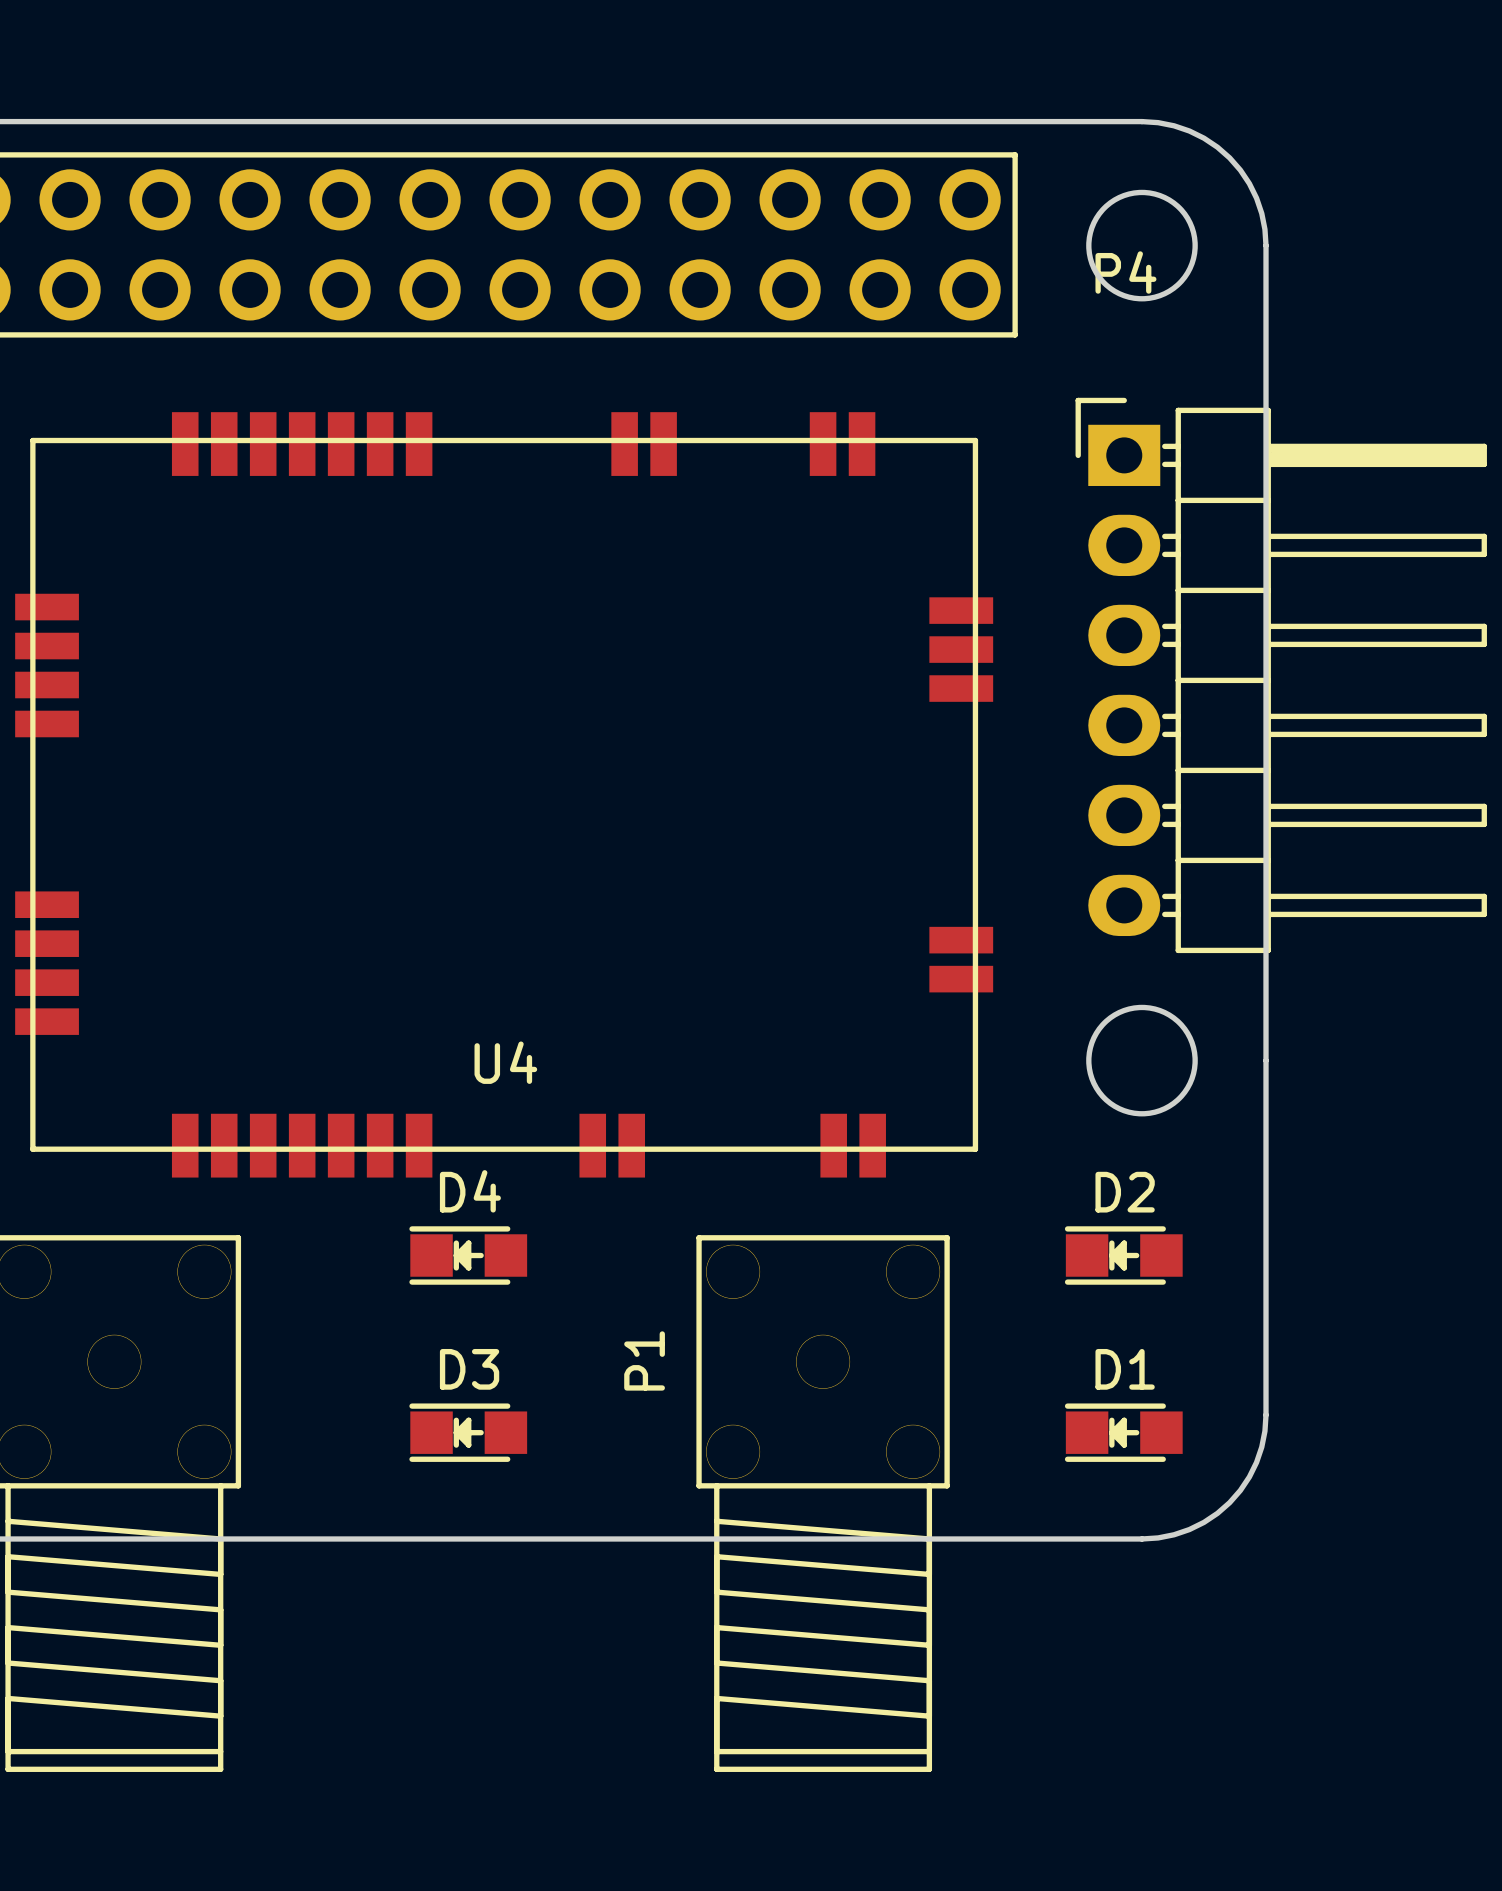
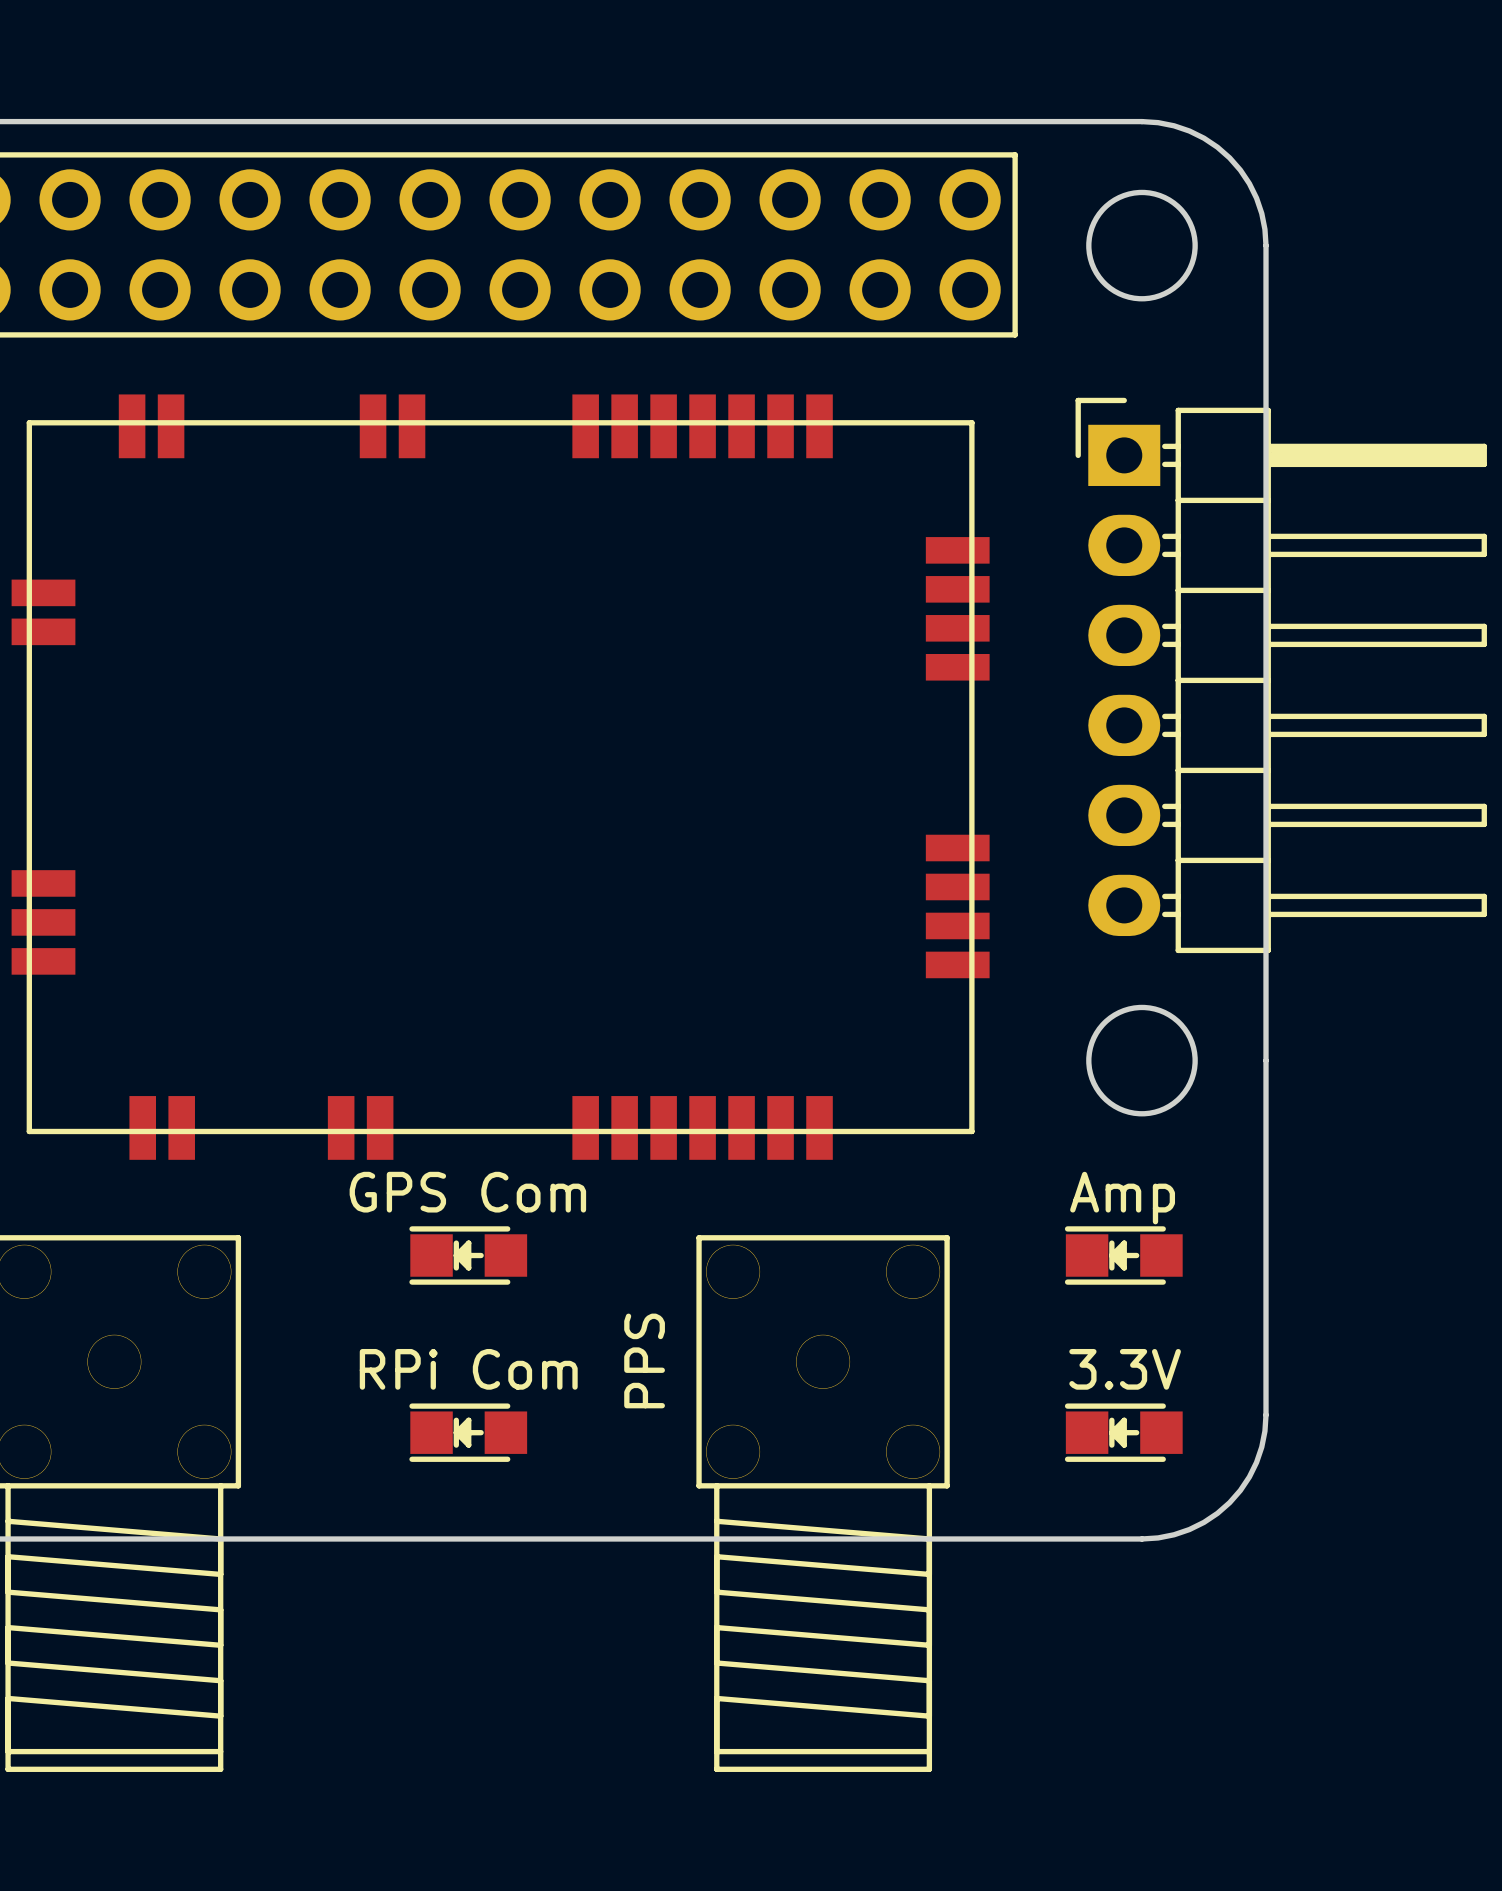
P4 name: P4 (1125, 272) -> none
part: none -> (500, 777)
U4: (504, 794) -> none
D4 name: D4 (470, 1191) -> GPS Com (467, 1192)
D2 name: D2 (1125, 1192) -> Amp (1122, 1198)
P1 name: P1 (644, 1360) -> PPS (644, 1360)
D3 name: D3 (469, 1369) -> RPi Com (468, 1369)
D1 name: D1 (1125, 1369) -> 3.3V (1125, 1369)

